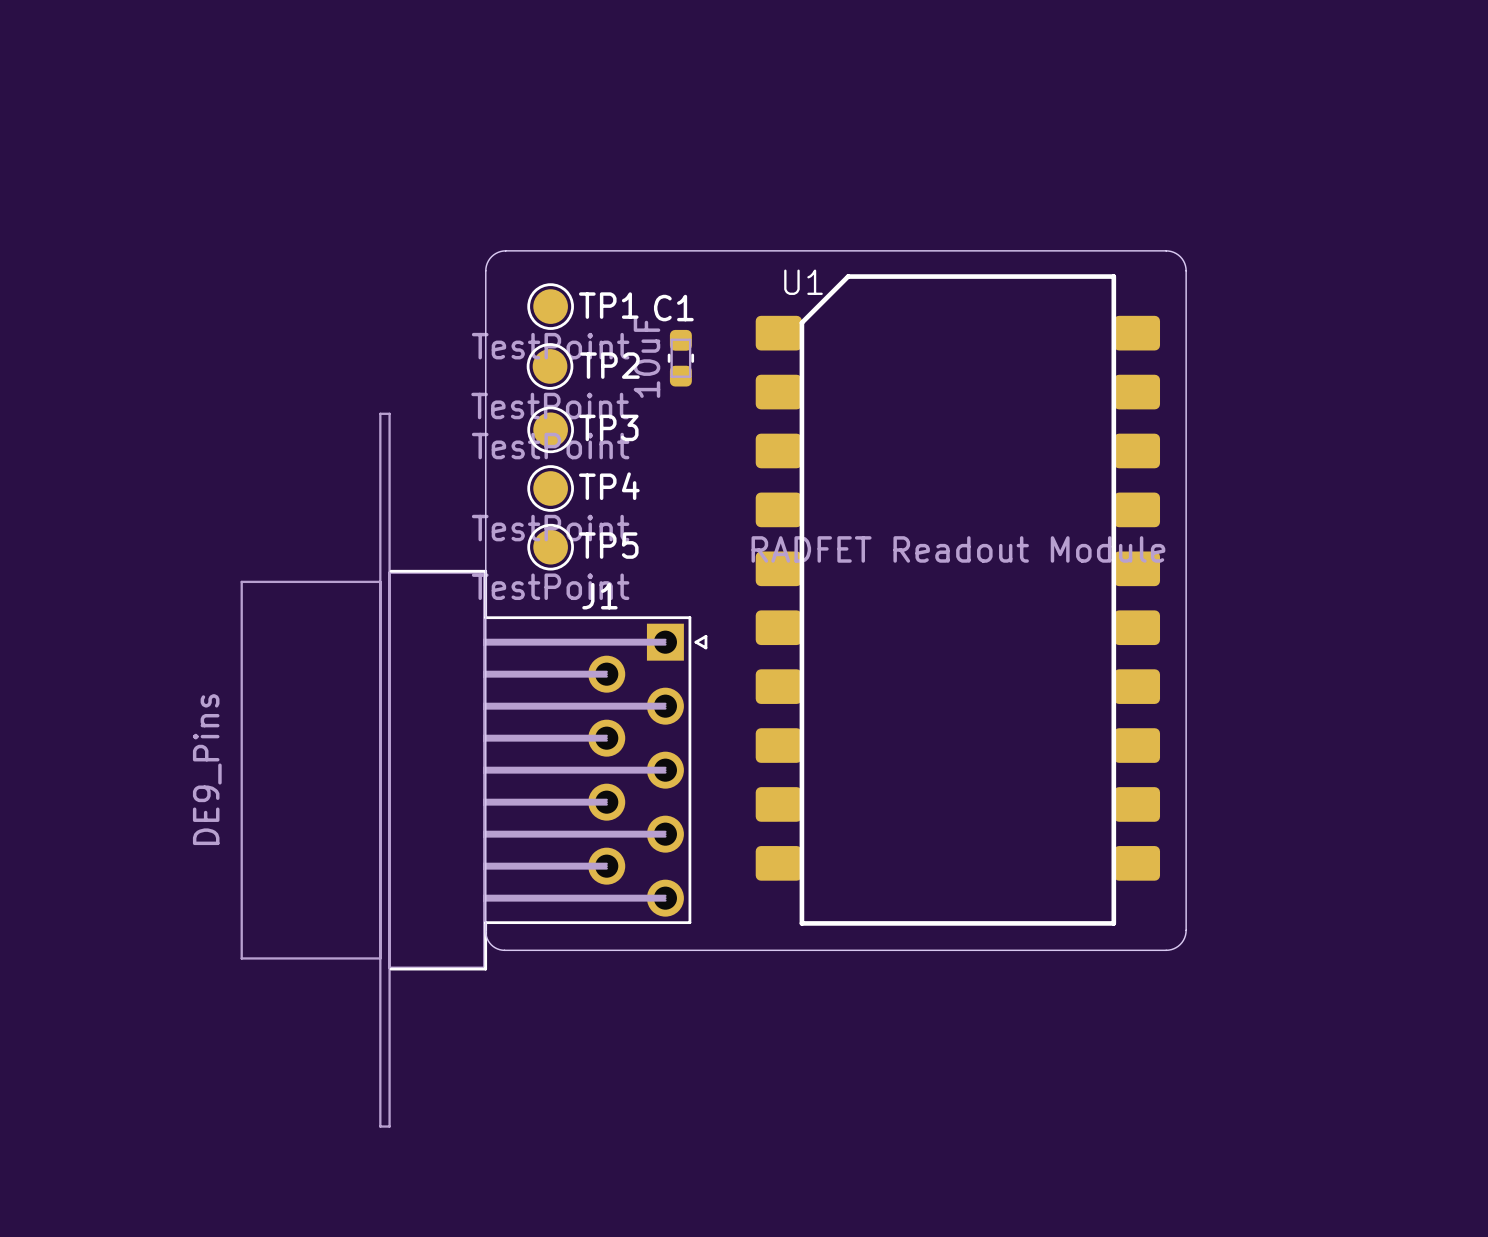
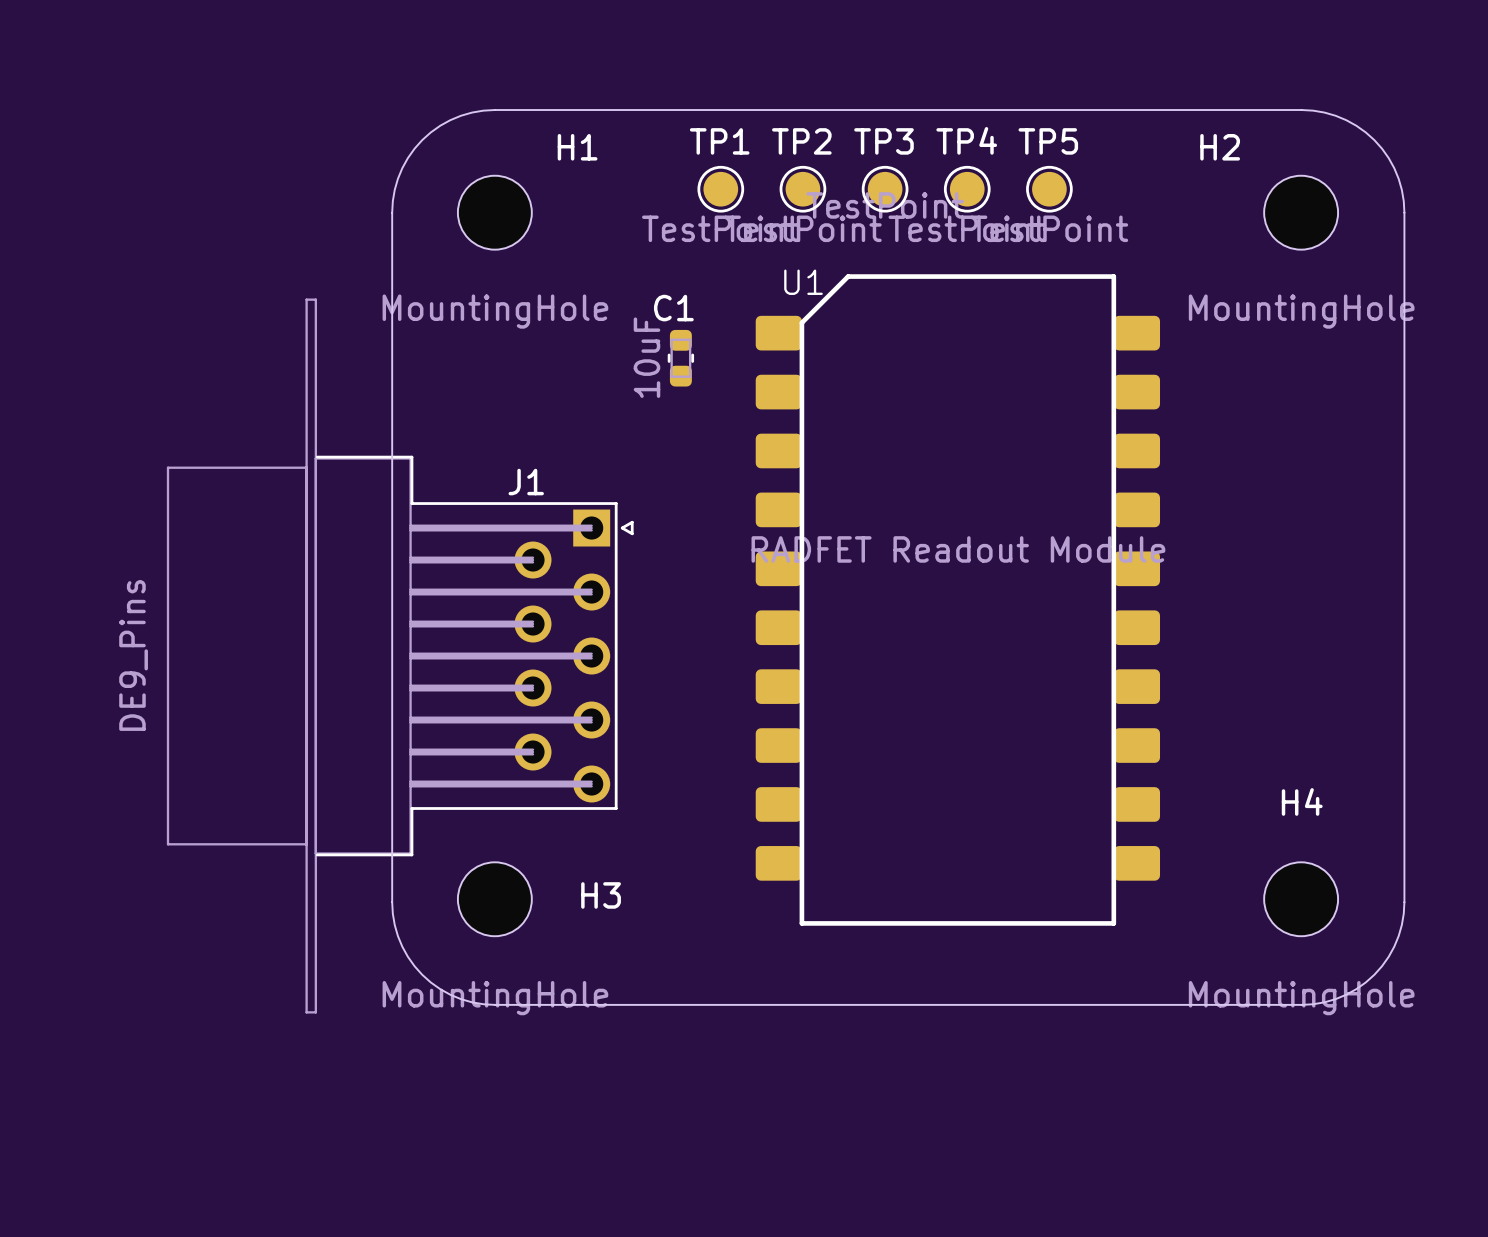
H1: none -> MountingHole (494, 212)
H2: none -> MountingHole (1301, 212)
board edge: (505, 250) (1166, 250) (1173, 252) (1180, 256) (1184, 263) (1186, 270) (1186, 930) (1184, 938) (1180, 944) (1173, 948) (1166, 950) (504, 950) (491, 944) (485, 931) (485, 270) (487, 263) (491, 256) (498, 252) (505, 250) -> (494, 110) (472, 112) (450, 120) (422, 140) (402, 168) (392, 201) (392, 902) (394, 925) (402, 946) (422, 974) (450, 994) (472, 1002) (494, 1004) (1301, 1004) (1335, 999) (1356, 989) (1374, 974) (1388, 956) (1398, 936) (1404, 902) (1404, 212) (1401, 189) (1394, 168) (1374, 140) (1356, 125) (1335, 115) (1301, 110) (494, 110)
TP1 name position: TP1 (608, 305) -> TP1 (719, 141)
TP1 position: (550, 306) -> (720, 189)
TP2 name position: TP2 (609, 365) -> TP2 (801, 141)
TP2 position: (550, 366) -> (802, 189)
TP3 name position: TP3 (608, 427) -> TP3 (884, 141)
TP3 position: (550, 429) -> (885, 189)
TP4 name position: TP4 (609, 486) -> TP4 (966, 140)
TP4 position: (550, 488) -> (967, 189)
TP5 name position: TP5 (608, 545) -> TP5 (1048, 141)
TP5 position: (550, 547) -> (1049, 189)
J1 position: (473, 770) -> (400, 656)
H3: none -> MountingHole (494, 899)
H4: none -> MountingHole (1301, 899)

